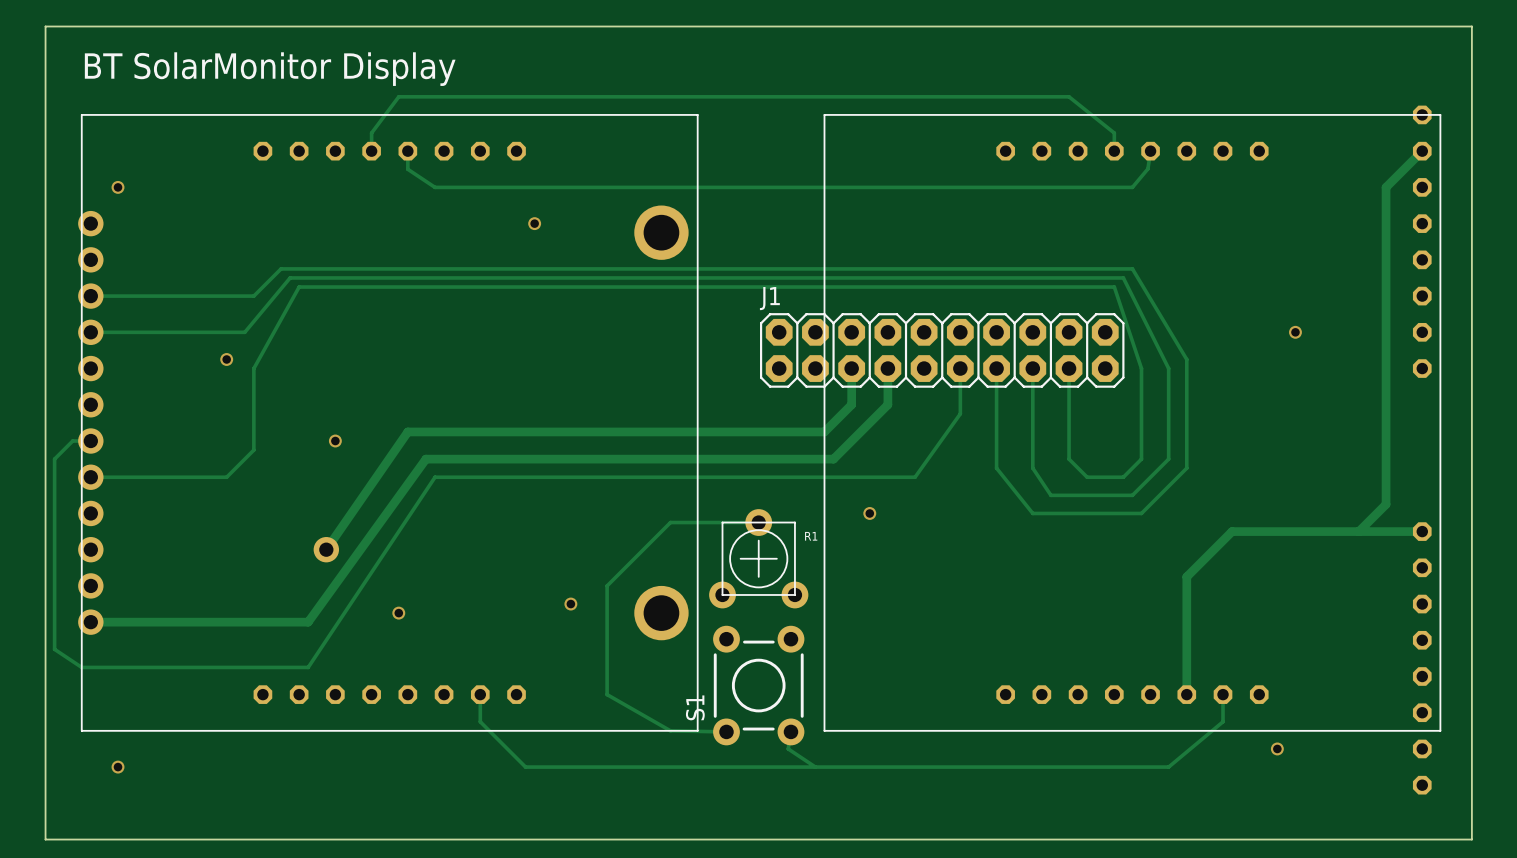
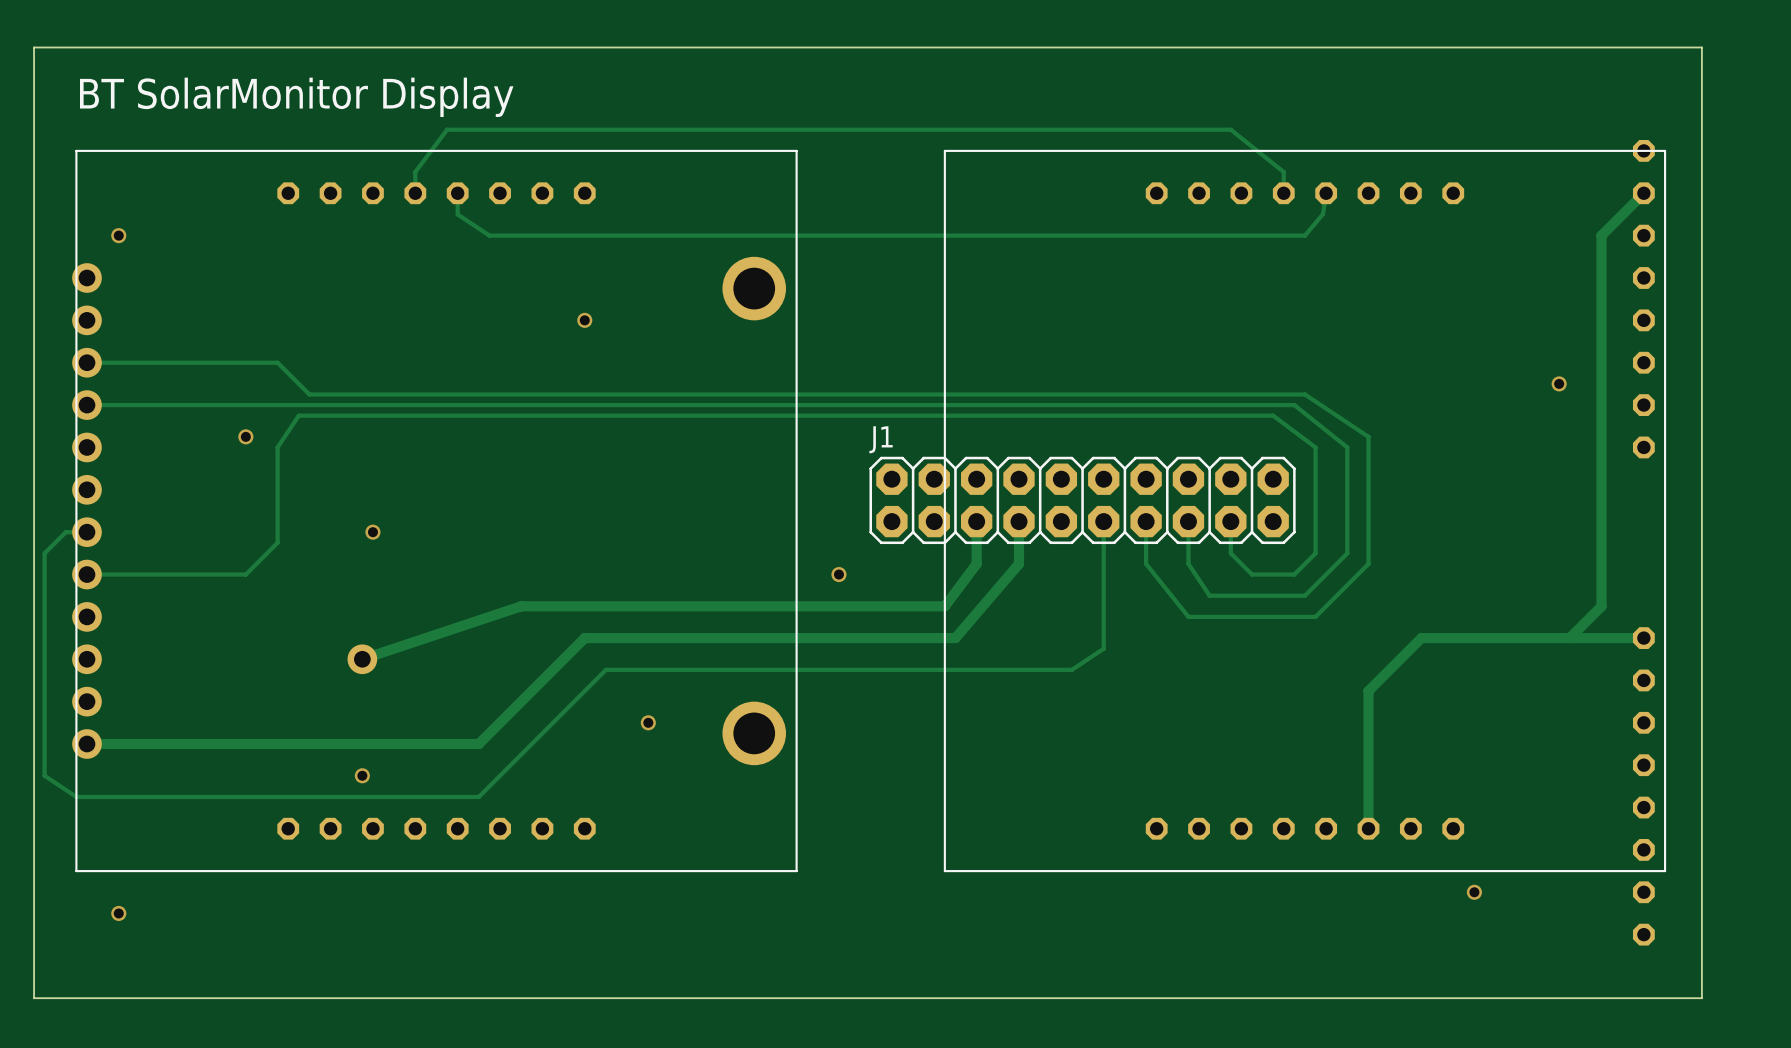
via position: (534, 223) -> (584, 320)
track: (253, 296) (281, 268) (1132, 268) (1186, 359) -> (277, 362) (309, 394) (1304, 394) (1368, 436)
track: (244, 332) (290, 277) (1123, 277) (1168, 368) -> (267, 405) (1294, 405) (1347, 447)
via position: (1295, 332) -> (1559, 383)
J1 position: (942, 350) -> (1082, 500)
track: (253, 368) (299, 287) (1114, 287) (1141, 368) -> (277, 447) (298, 415) (1273, 415) (1315, 447)
track: (851, 368) (851, 404) (824, 431) (407, 431) (326, 549) -> (976, 521) (976, 563) (944, 606) (521, 606) (362, 659)
track: (887, 368) (887, 404) (833, 459) (425, 459) (308, 622) -> (1019, 521) (1019, 563) (955, 638) (584, 638) (478, 744) (341, 744)
track: (960, 368) (960, 413) (915, 477) (435, 477) (308, 667) -> (1103, 521) (1103, 648) (1071, 669) (605, 669) (478, 796) (341, 796)
track: (996, 368) (996, 431) -> none
track: (1032, 368) (1032, 431) -> none
track: (1069, 368) (1069, 431) -> none
via: none -> (838, 574)
via: (869, 513) -> none
track: (758, 522) (670, 522) (607, 585) (607, 694) (670, 730) (726, 731) -> none
R1: (758, 558) -> none
via position: (398, 613) -> (362, 775)
S1: (758, 685) -> none
track: (480, 694) (480, 721) (525, 767) (1168, 767) (1223, 721) (1223, 694) -> none
track: (790, 731) (788, 748) (815, 767) -> none

